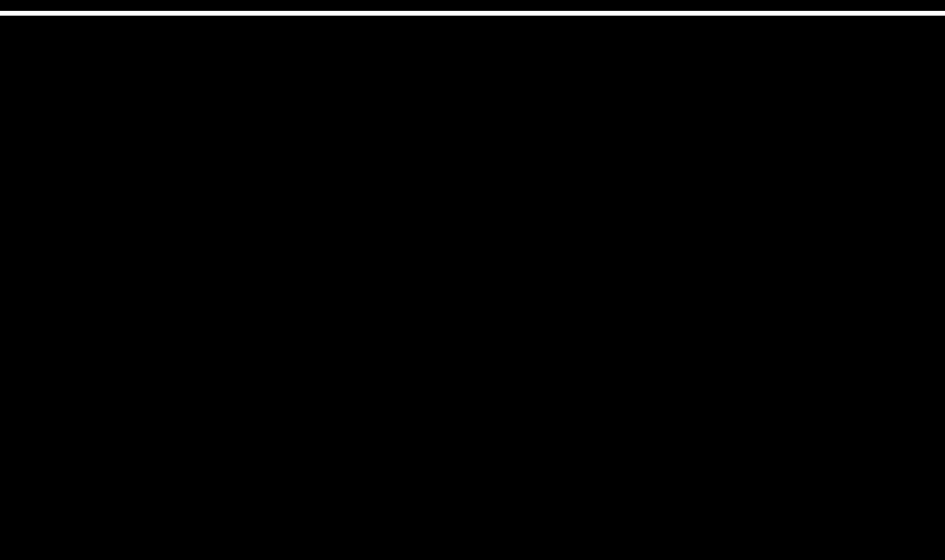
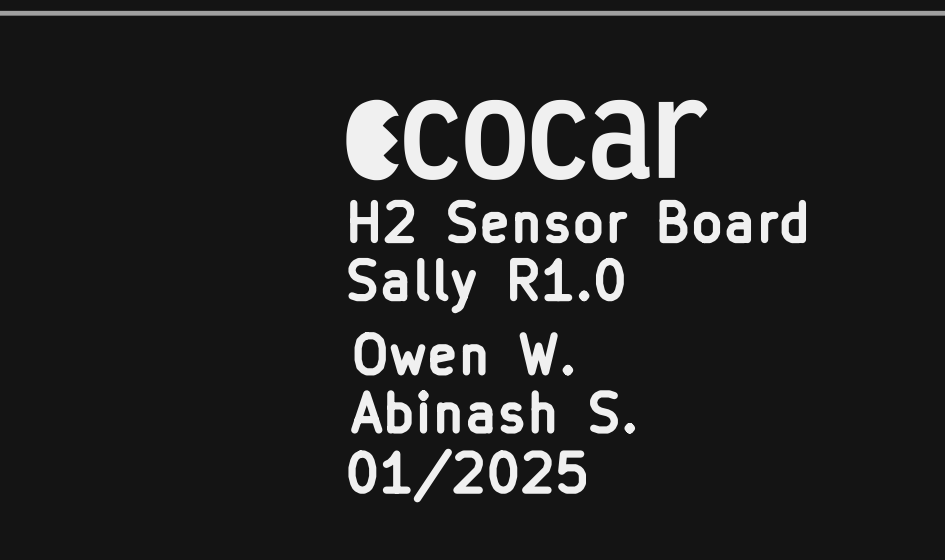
drawing: none -> [346, 99, 708, 181]
text: none -> H2 Sensor Board (578, 221)
text: none -> Sally R1.0 (486, 285)
text: none -> Owen W. (463, 353)
text: none -> Abinash S. (493, 411)
text: none -> 01/2025 (467, 475)

